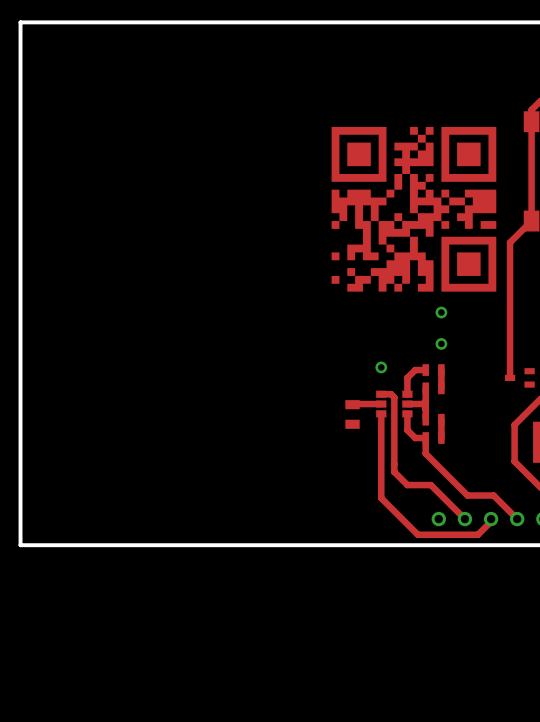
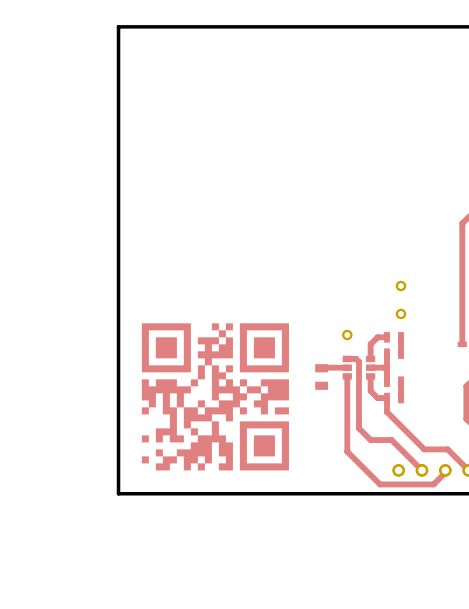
board edge: (125, 22) (20, 22) (20, 545) (125, 545) -> (118, 26) (118, 493)
drawing: [331, 126, 497, 292] -> none
drawing: none -> [141, 323, 289, 471]

